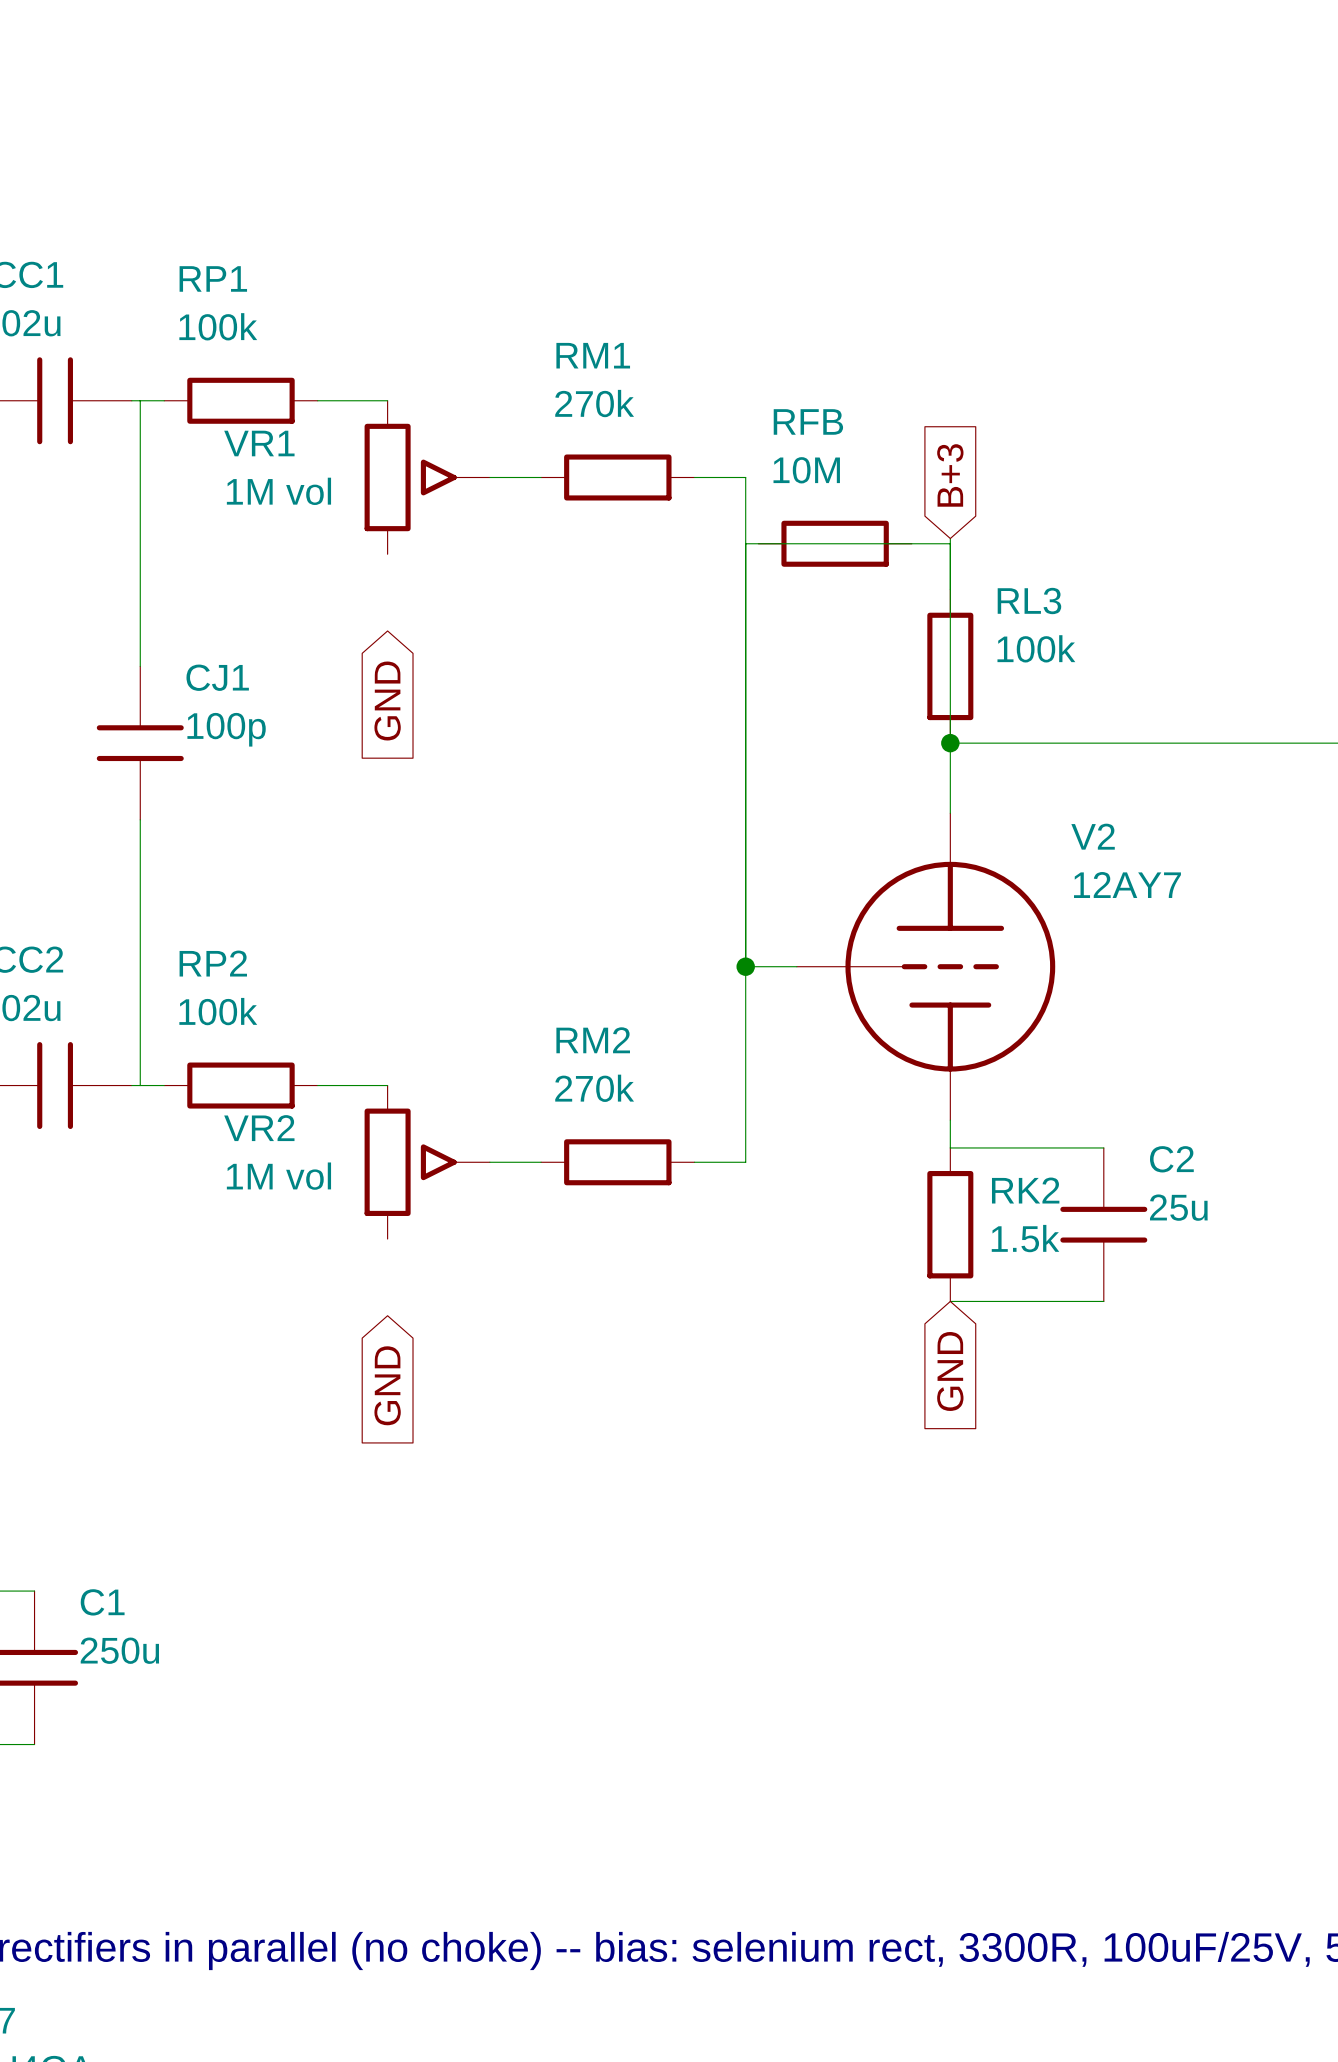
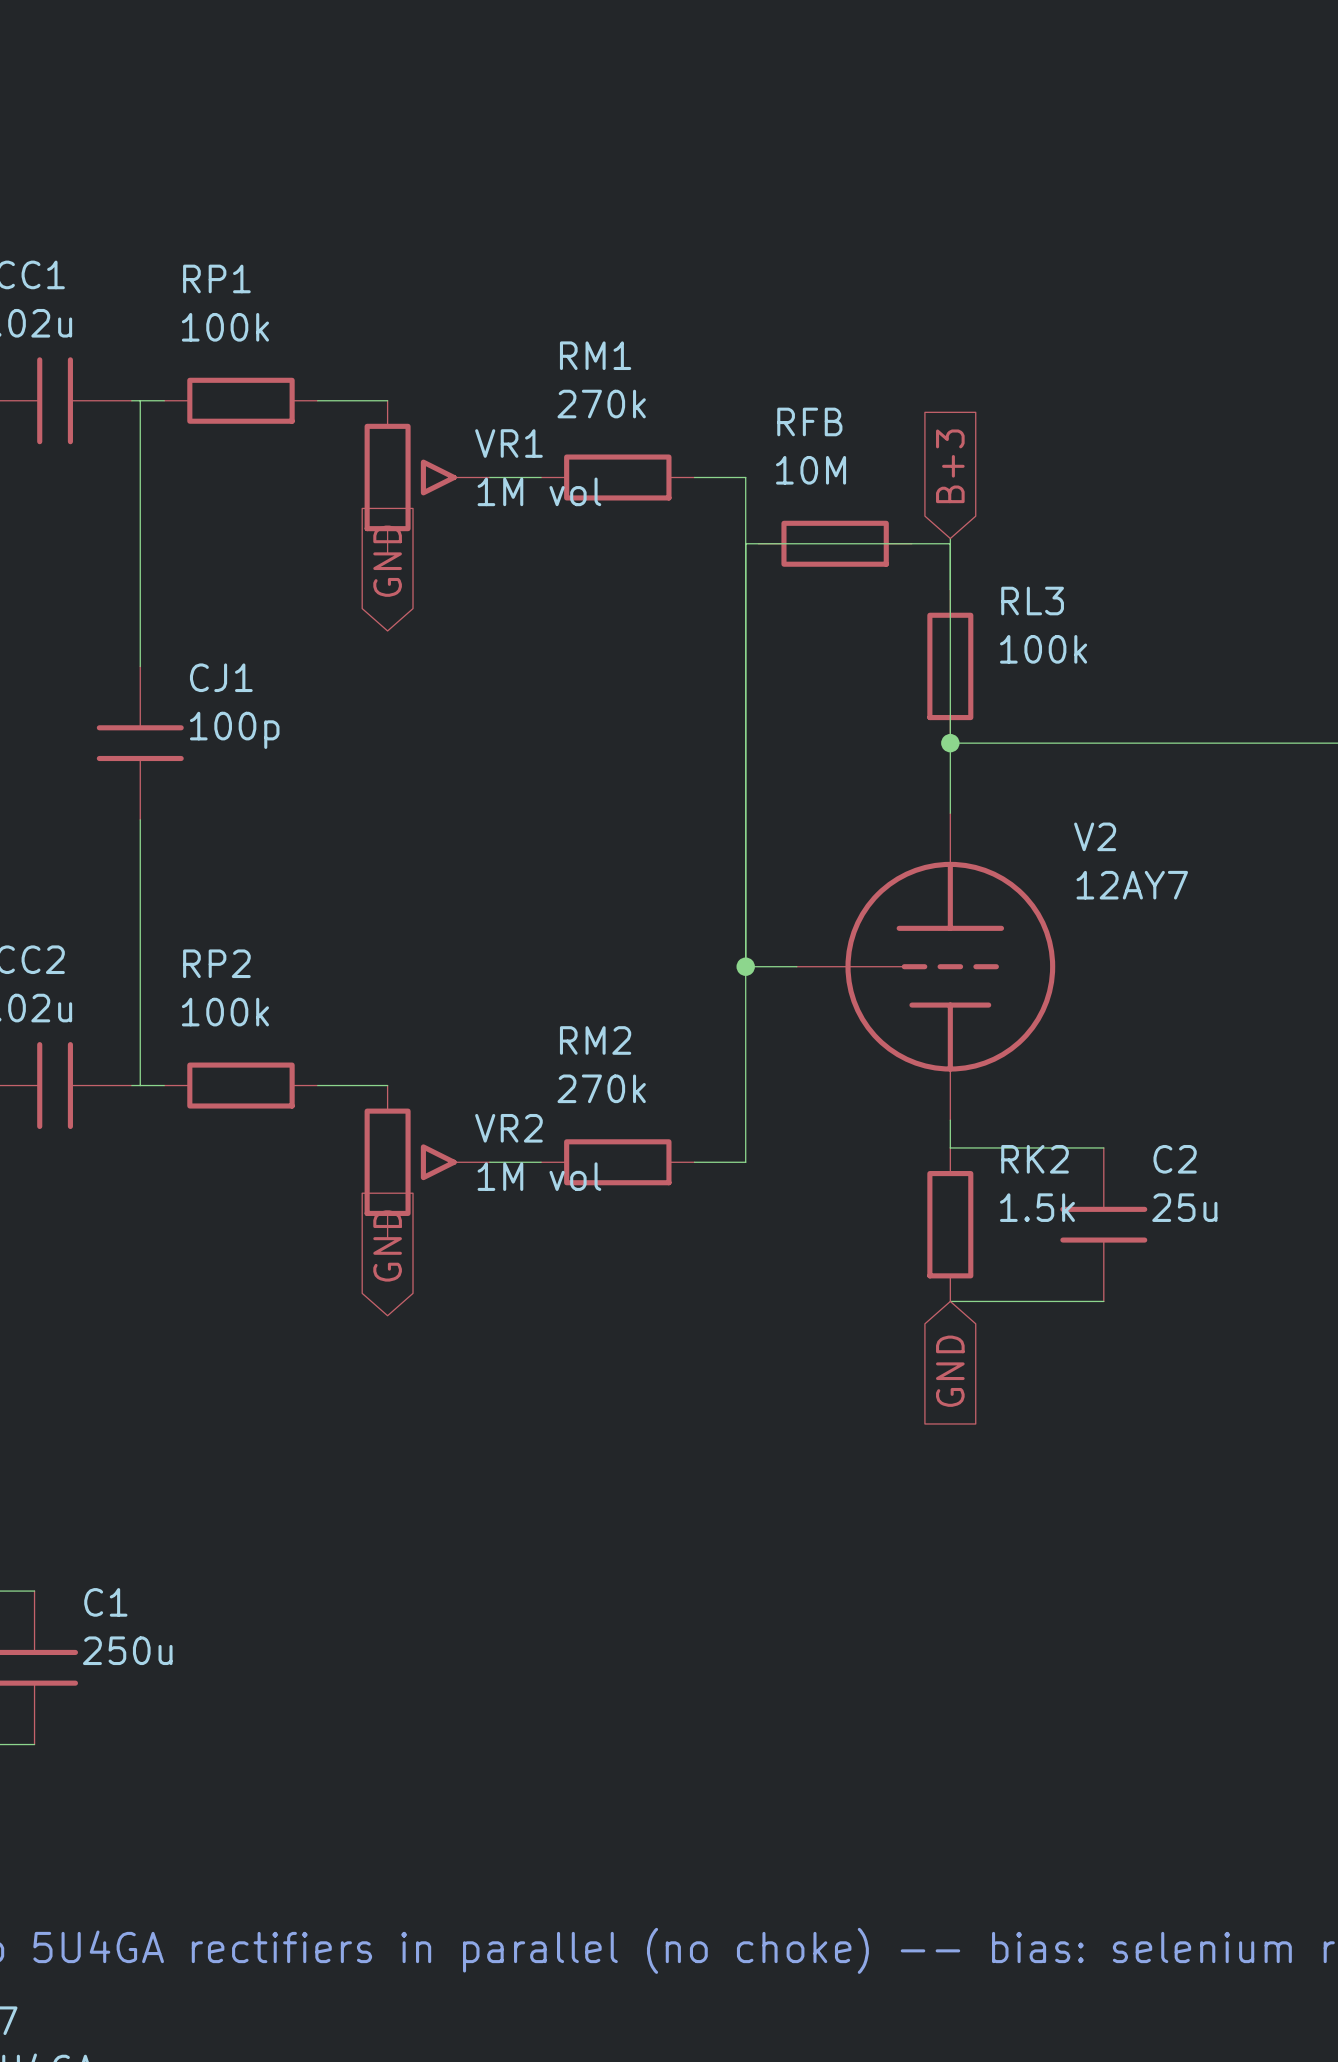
VR1 name position: VR1 (259, 443) -> VR1 (508, 443)
VR1 value position: 1M vol (278, 491) -> 1M vol (539, 491)
global label rotation: 0° (387, 701) -> 180° (387, 561)
VR2 name position: VR2 (259, 1128) -> VR2 (508, 1128)
VR2 value position: 1M vol (278, 1176) -> 1M vol (539, 1176)
RK2 name position: RK2 (1025, 1190) -> RK2 (1035, 1159)
RK2 value position: 1.5k (1025, 1238) -> 1.5k (1037, 1207)
global label rotation: 0° (387, 1385) -> 180° (387, 1245)

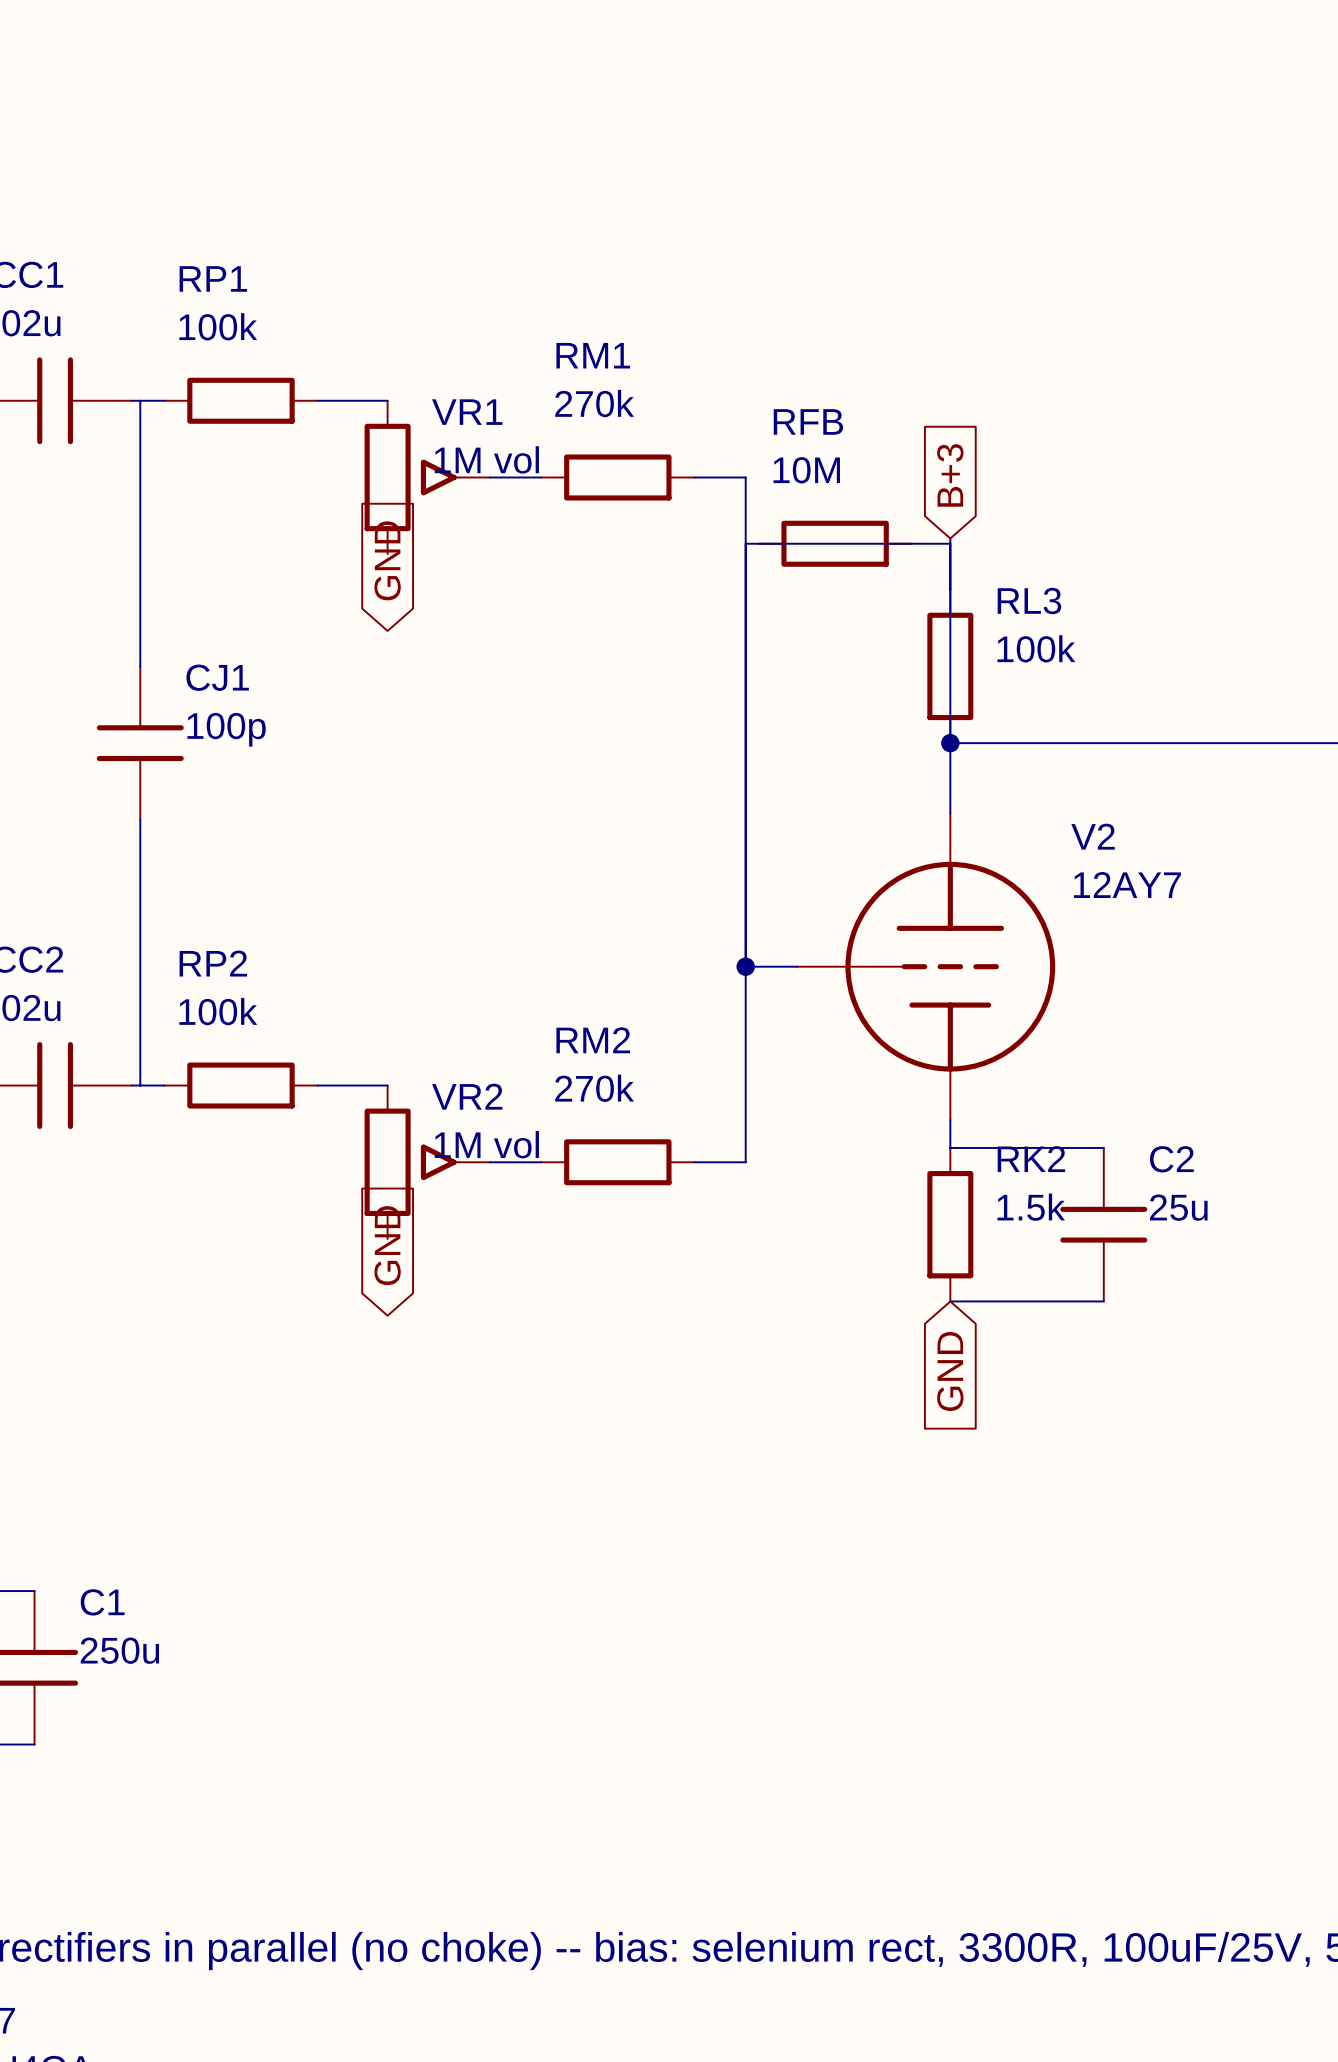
VR1 name position: VR1 (508, 443) -> VR1 (467, 412)
VR1 value position: 1M vol (539, 491) -> 1M vol (486, 459)
VR2 name position: VR2 (508, 1128) -> VR2 (467, 1096)
VR2 value position: 1M vol (539, 1176) -> 1M vol (486, 1144)

